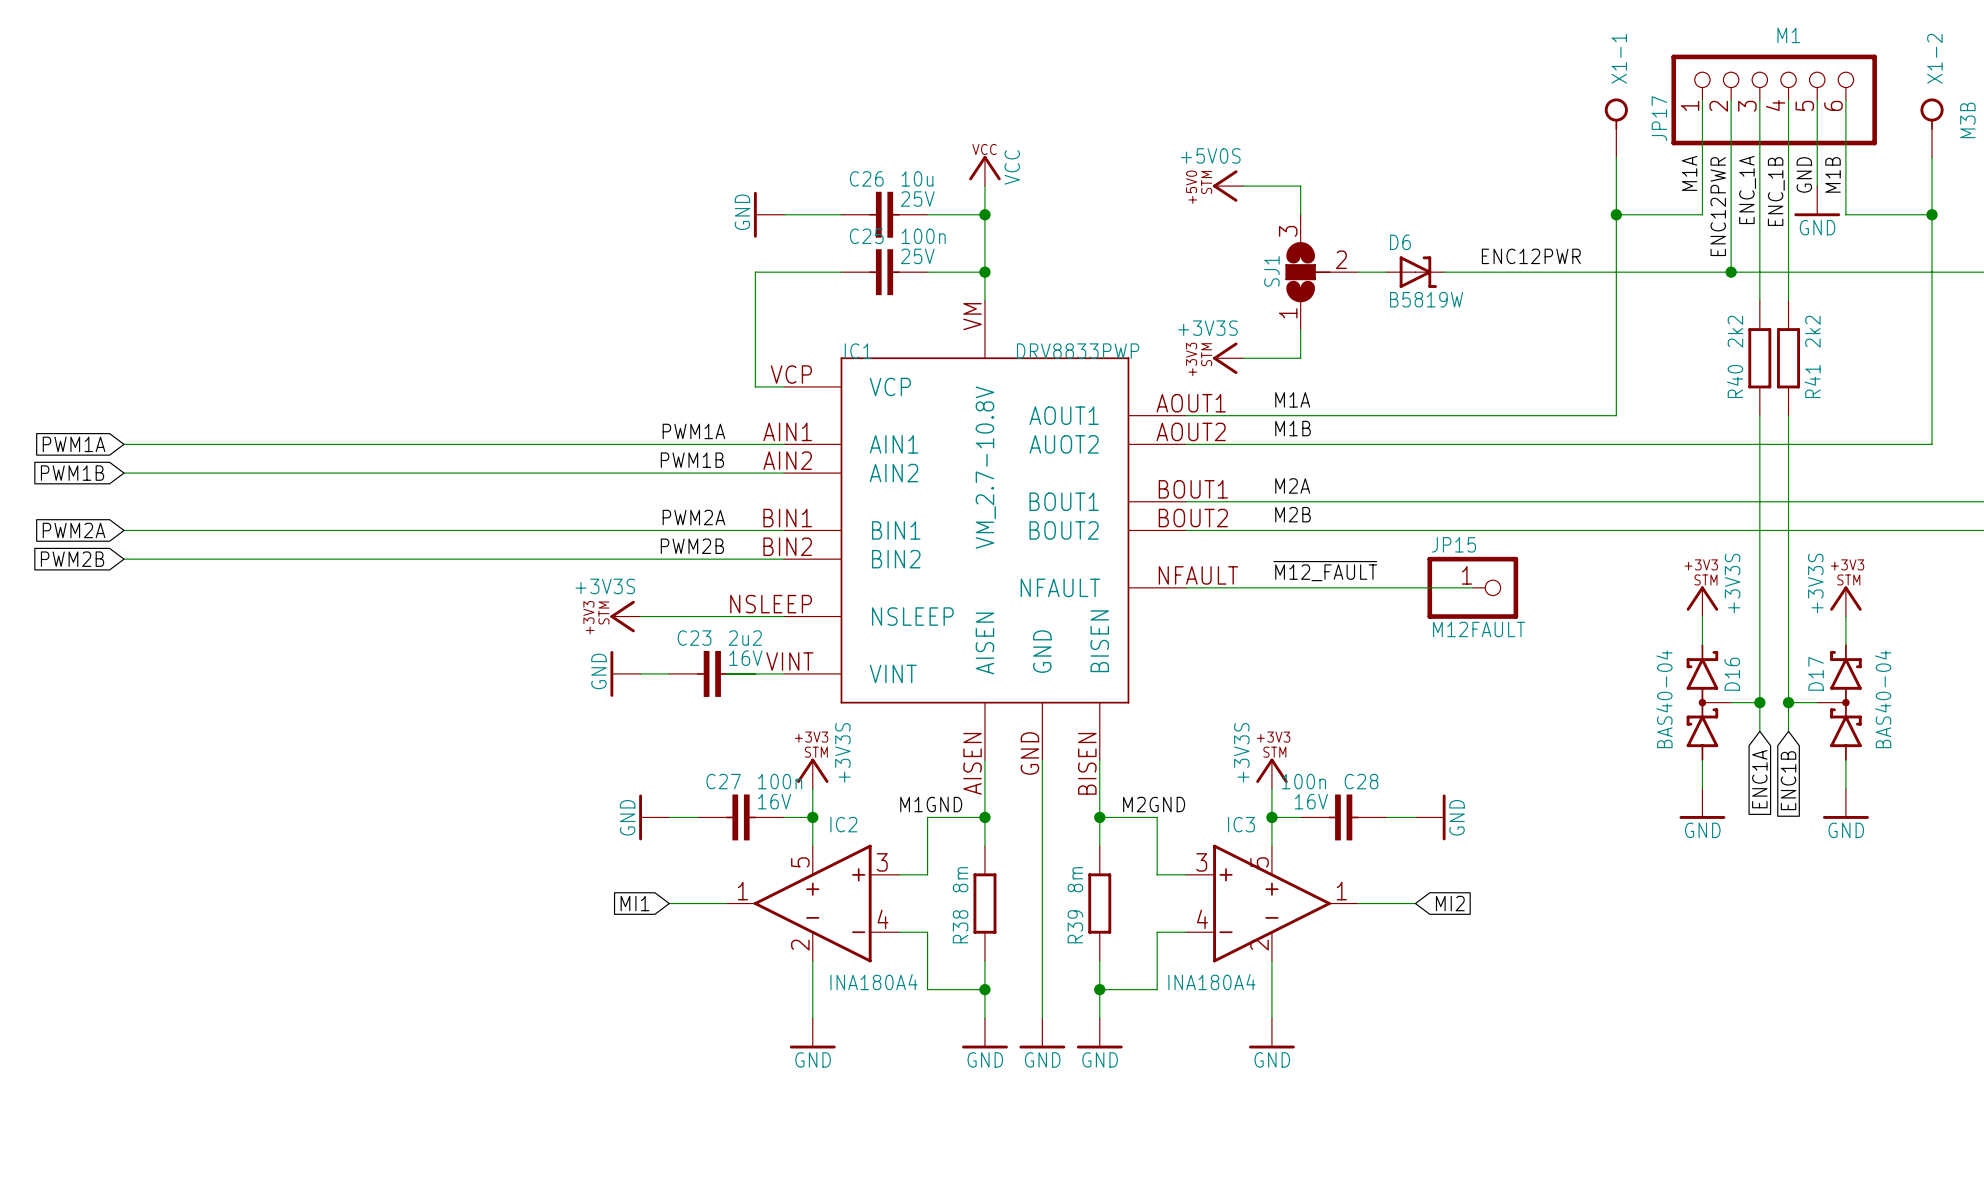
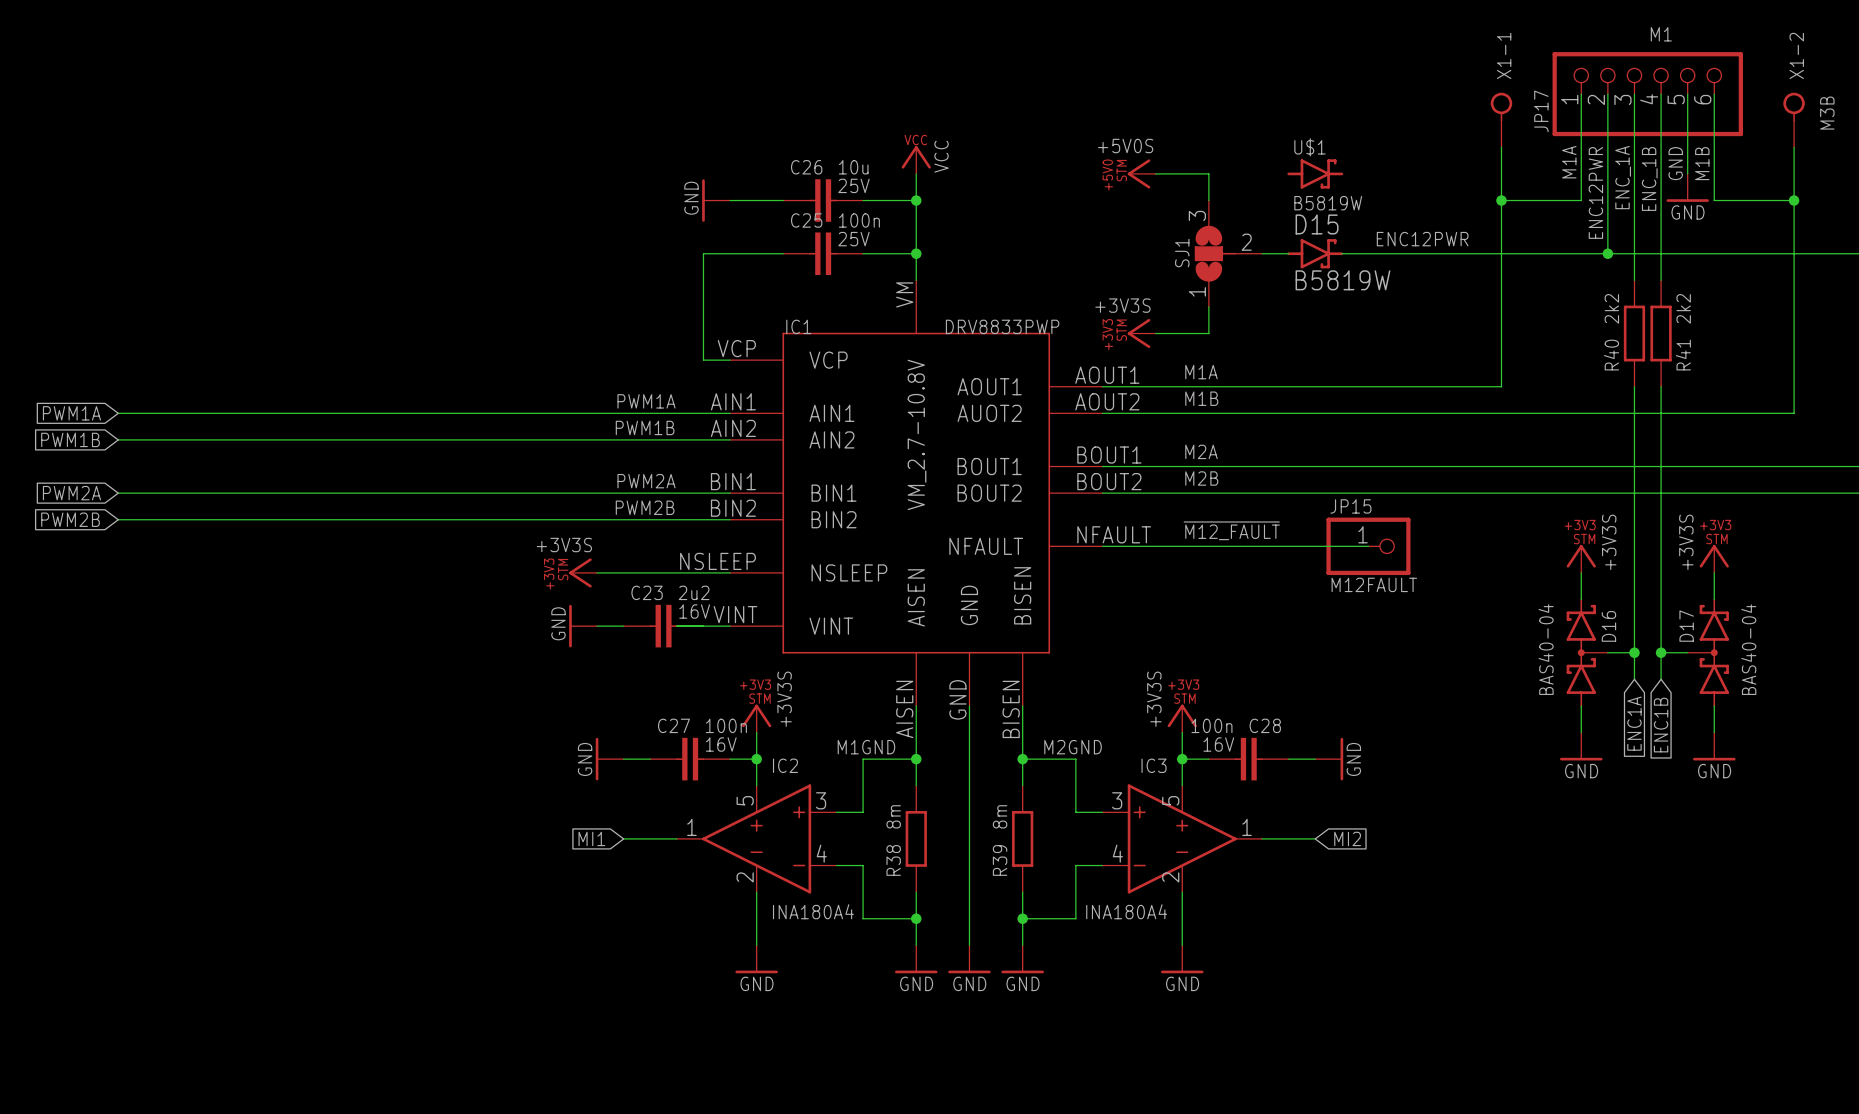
U$1: none -> B5819W (1315, 173)
D6: B5819W (1415, 272) -> none
D15: none -> B5819W (1315, 253)

